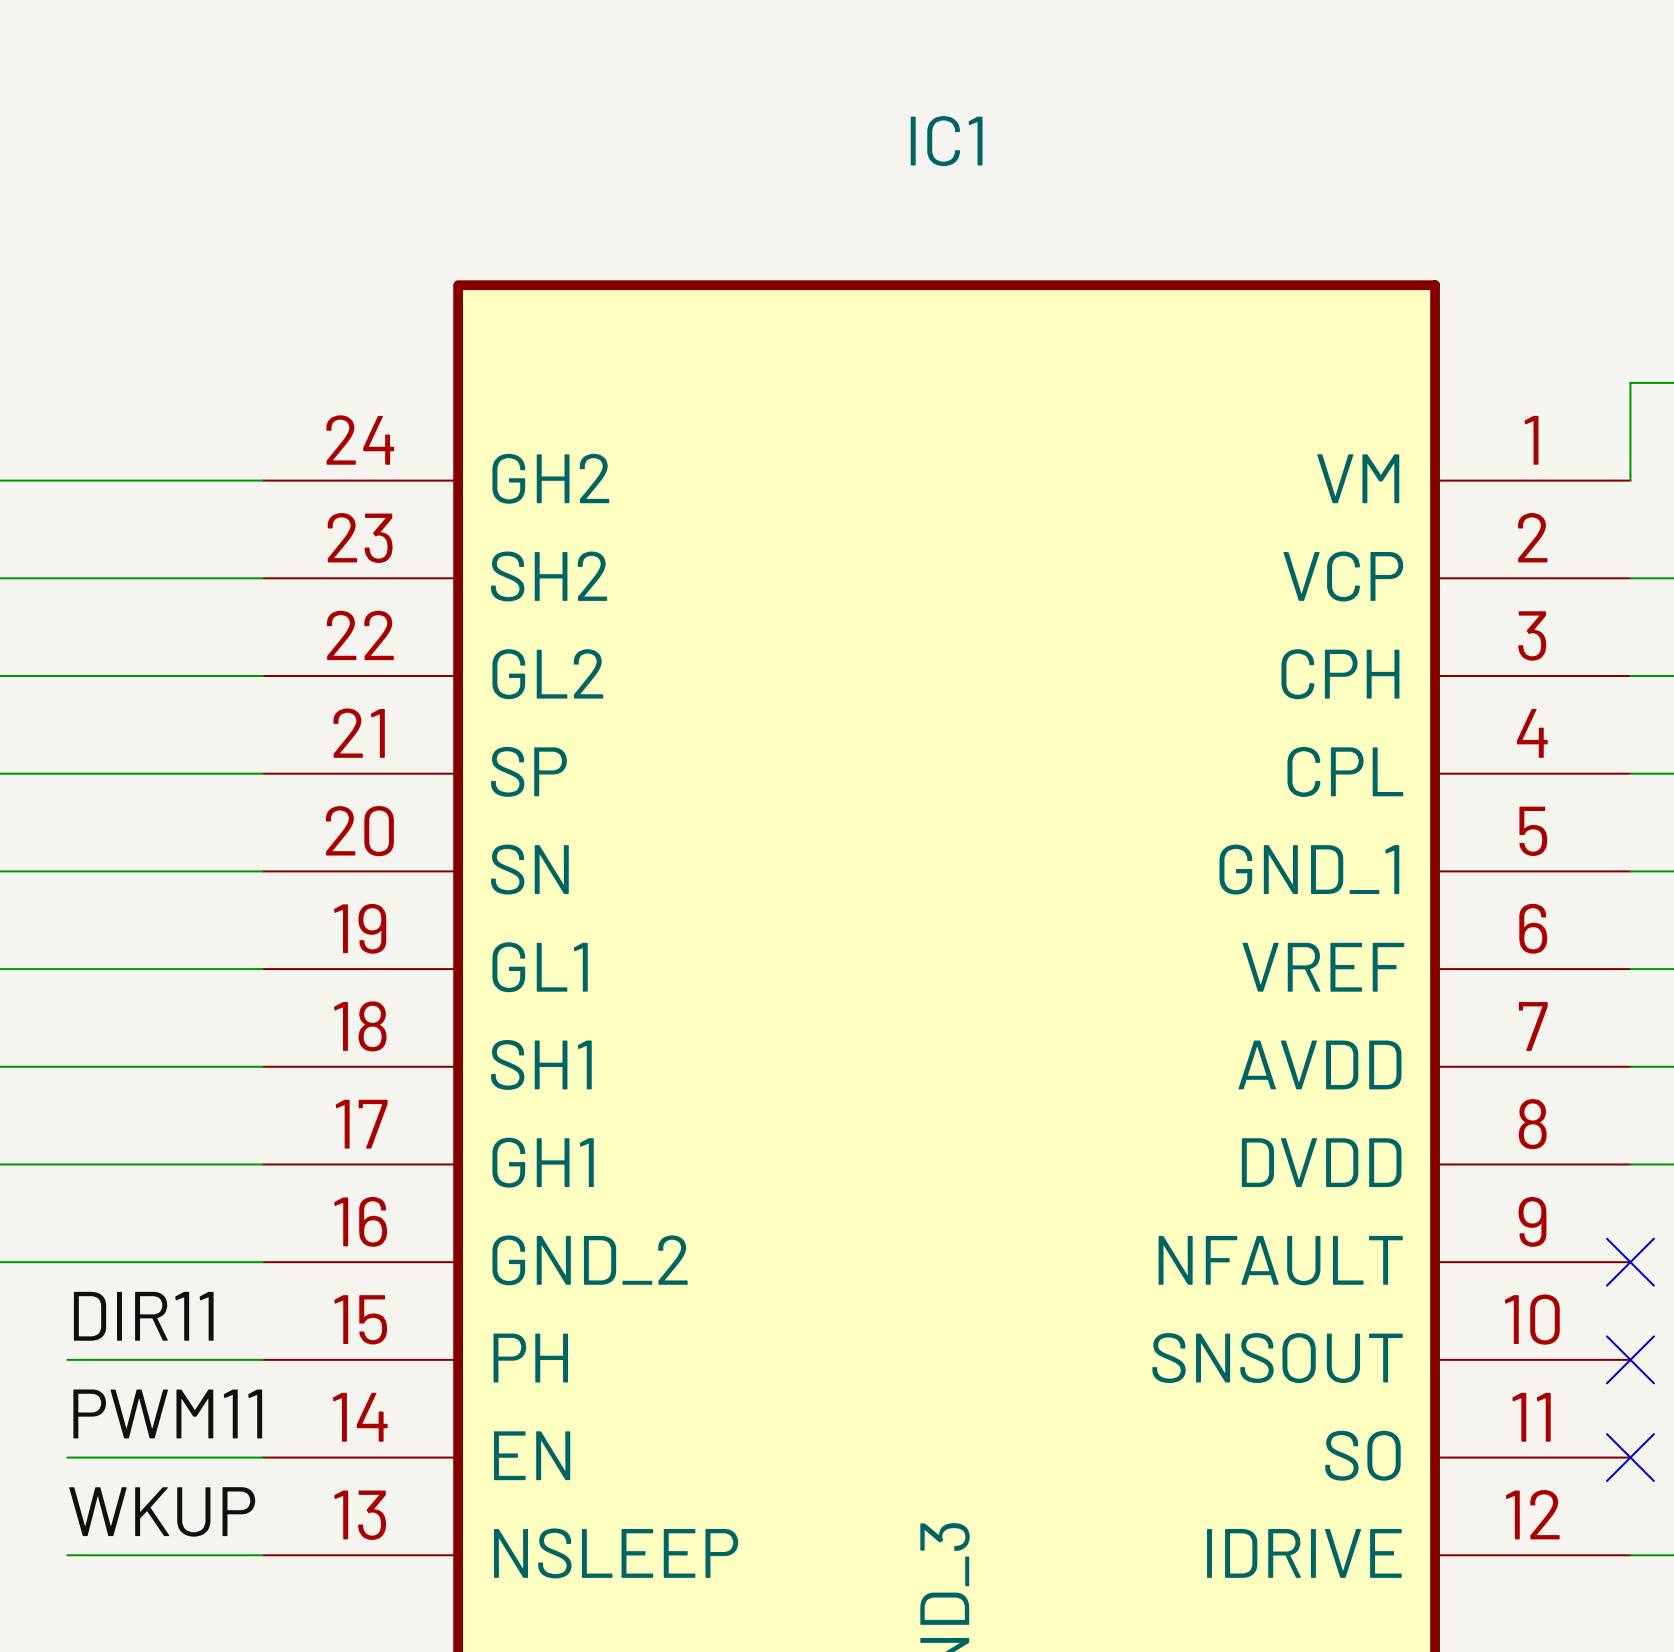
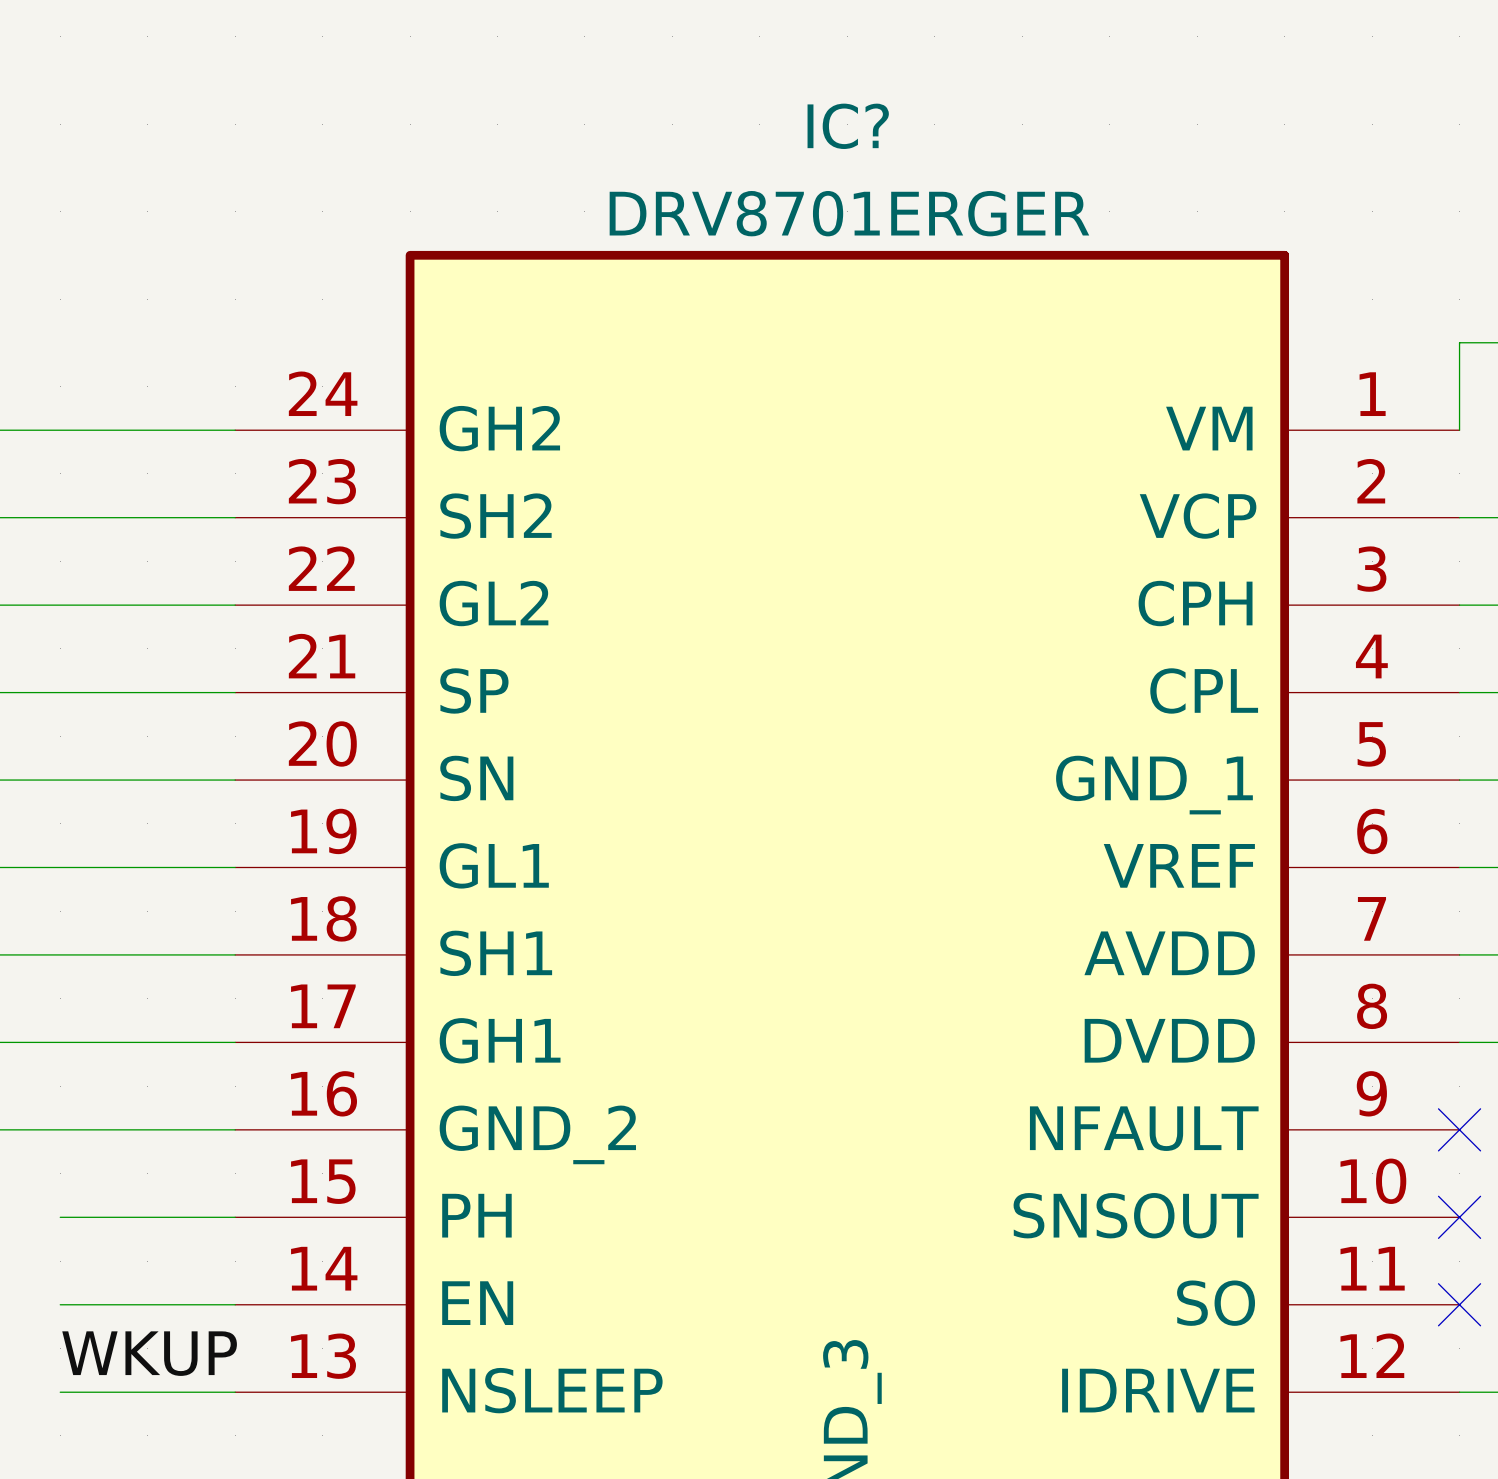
IC1 name: IC1 (946, 141) -> IC? (848, 126)
IC1 value: none -> DRV8701ERGER (849, 213)
label: DIR11 (143, 1316) -> none
label: PWM11 (167, 1413) -> none

